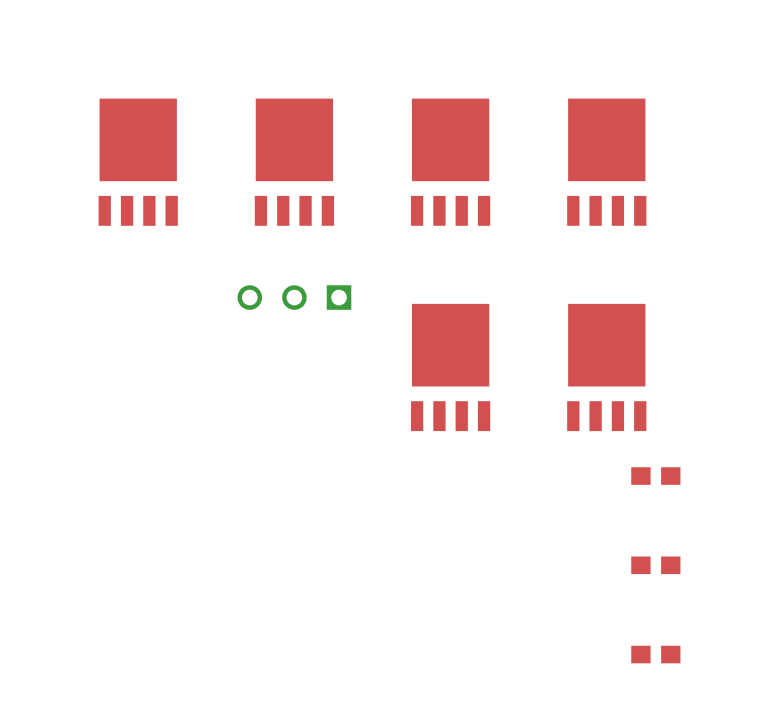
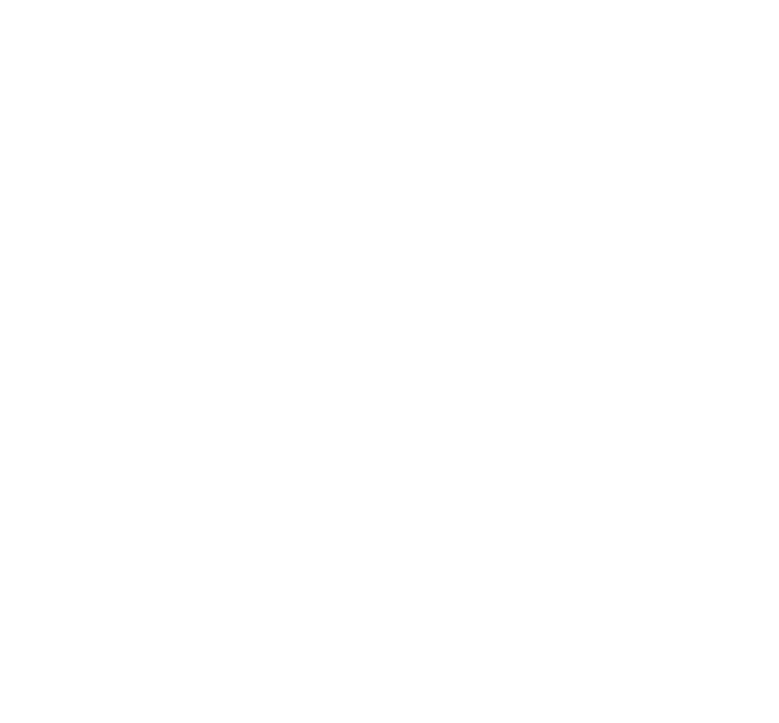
part: (138, 162) -> none
part: (294, 162) -> none
part: (450, 162) -> none
part: (606, 162) -> none
part: (294, 297) -> none
part: (450, 367) -> none
part: (606, 367) -> none
part: (655, 476) -> none
part: (655, 565) -> none
part: (655, 654) -> none

